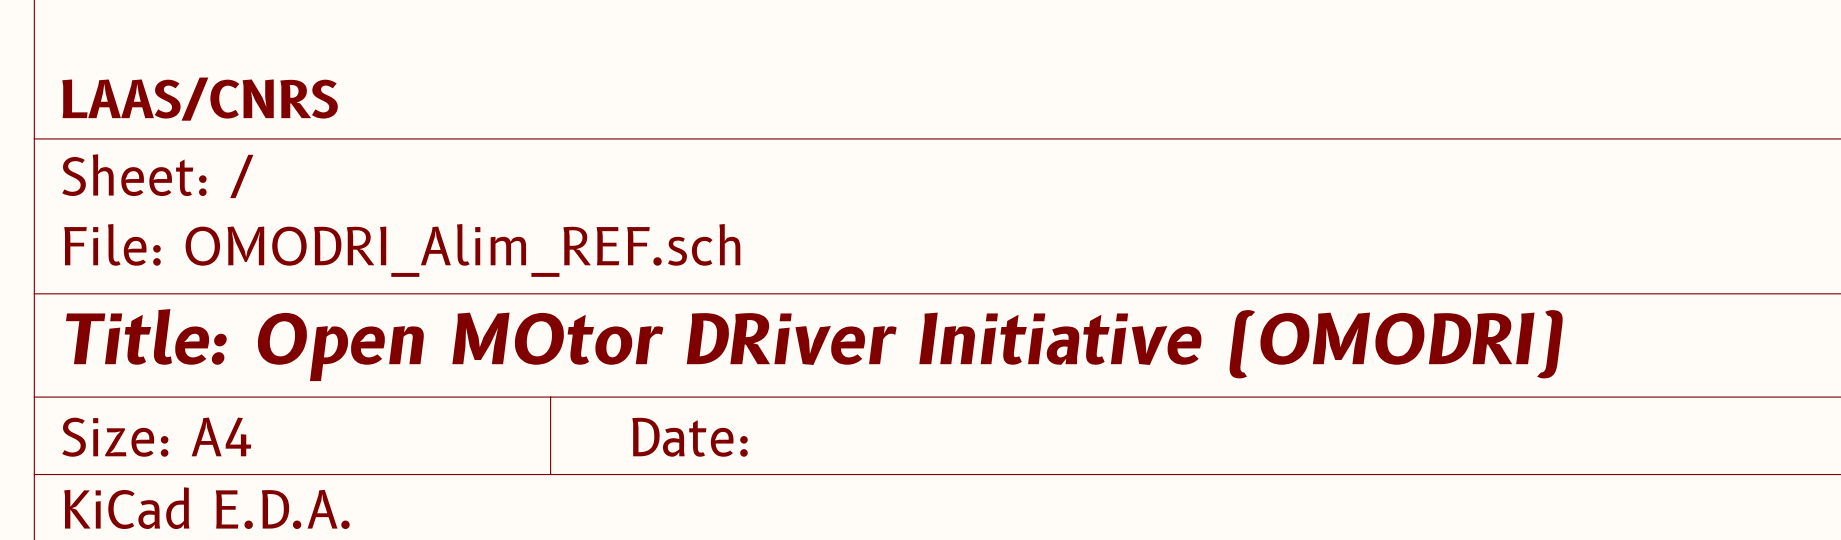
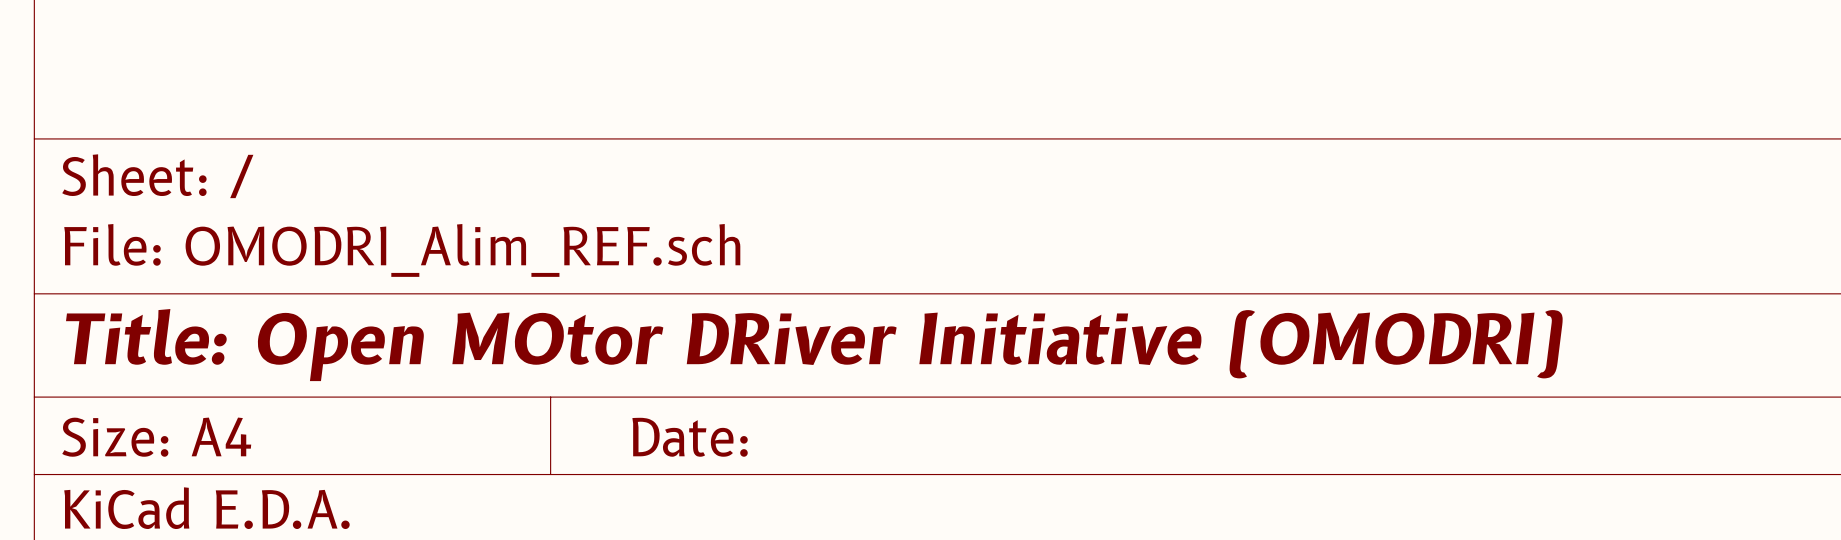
title block: LAAS/CNRS (200, 99) -> none

